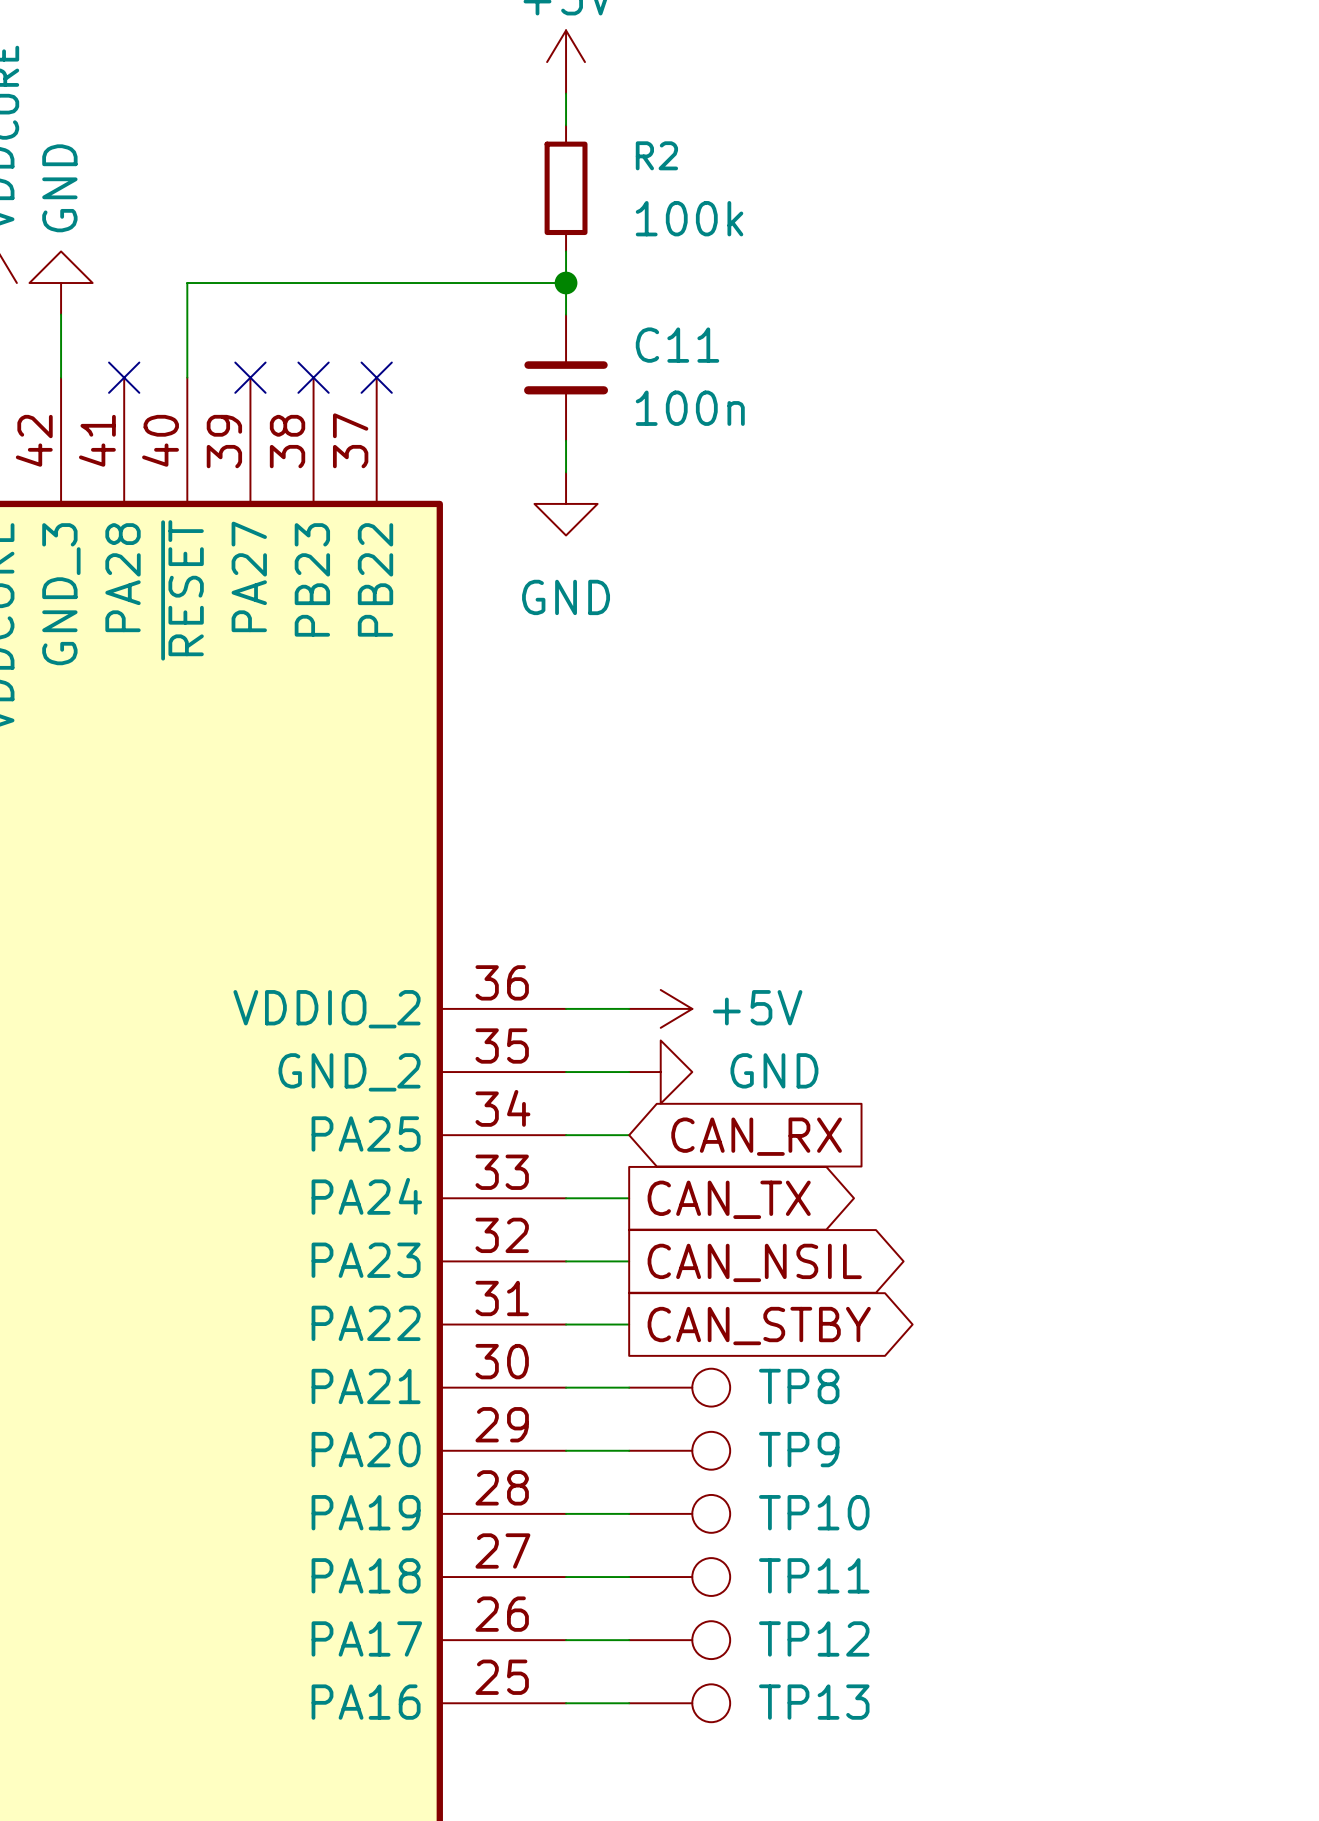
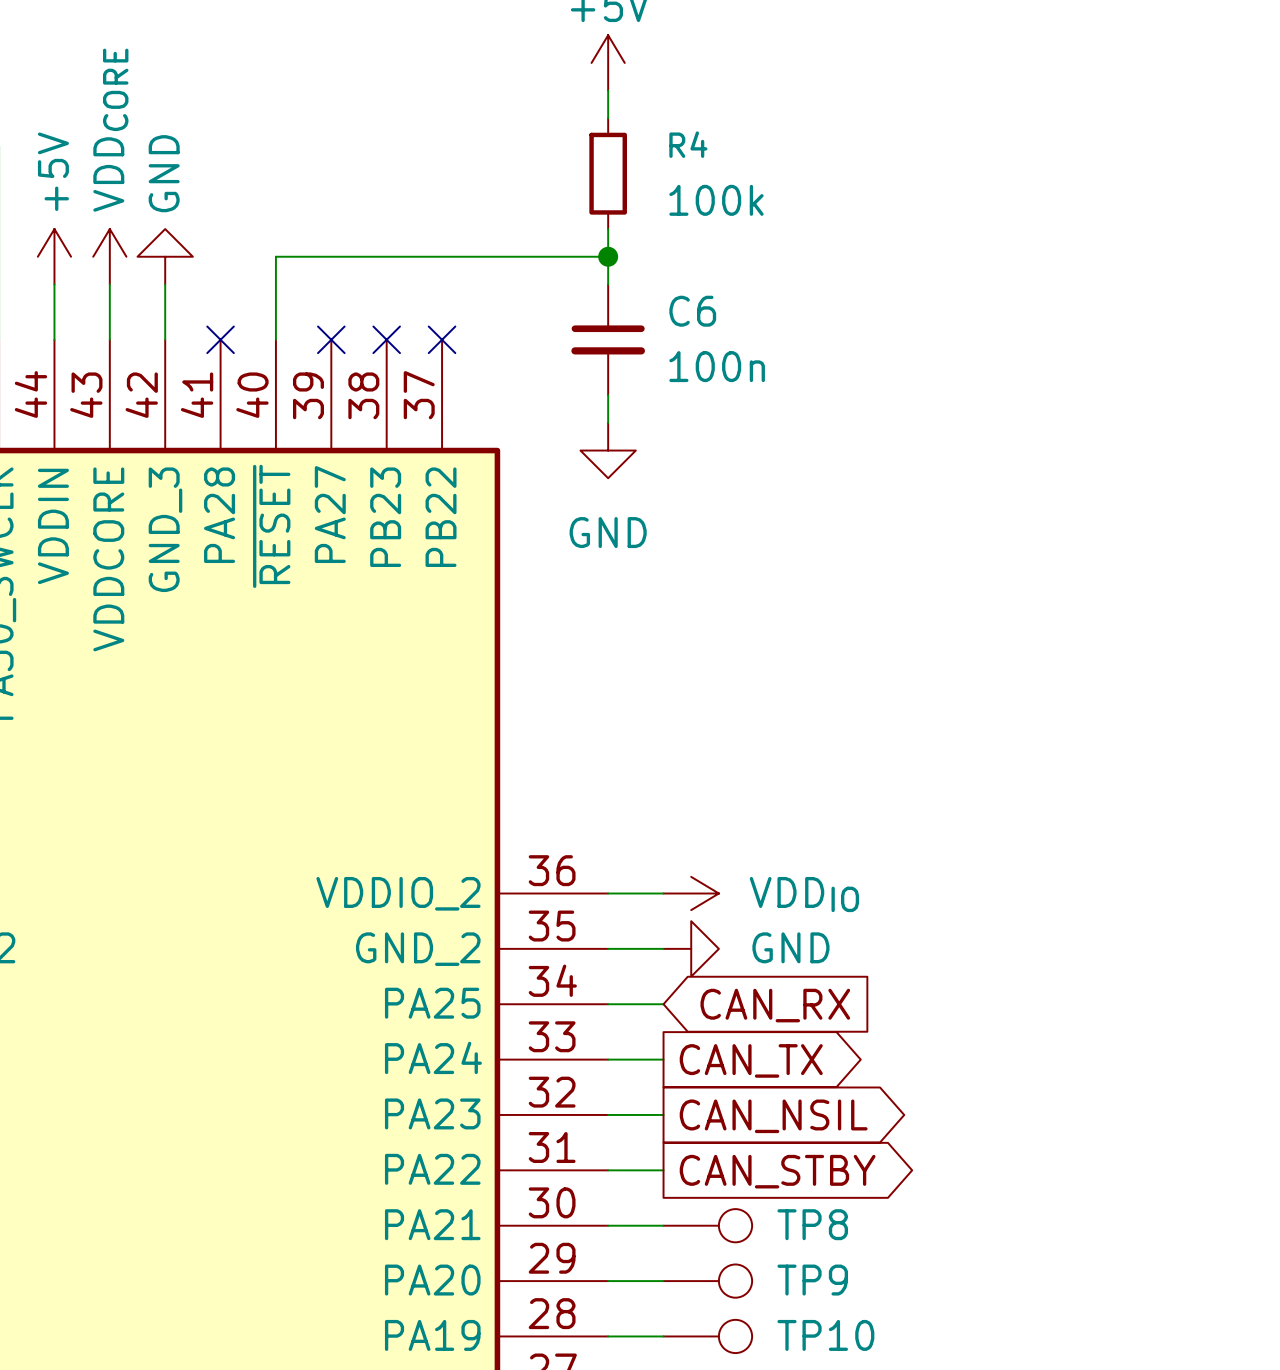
R2 name: R2 (656, 155) -> R4 (688, 144)
C11 name: C11 (677, 345) -> C6 (692, 311)
power symbol: +5V (660, 1008) -> VDDIO (691, 893)

